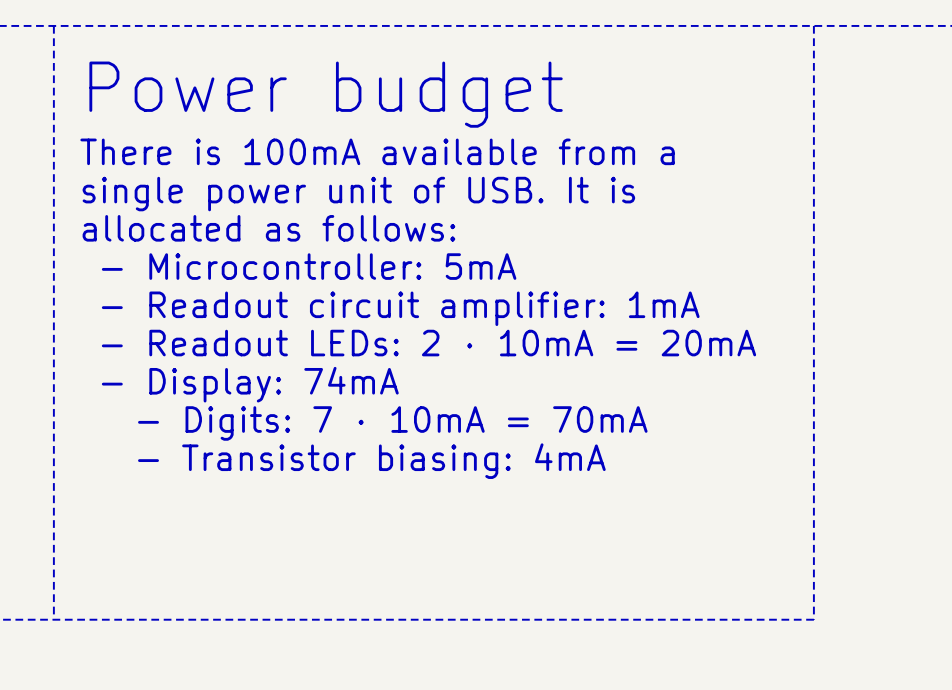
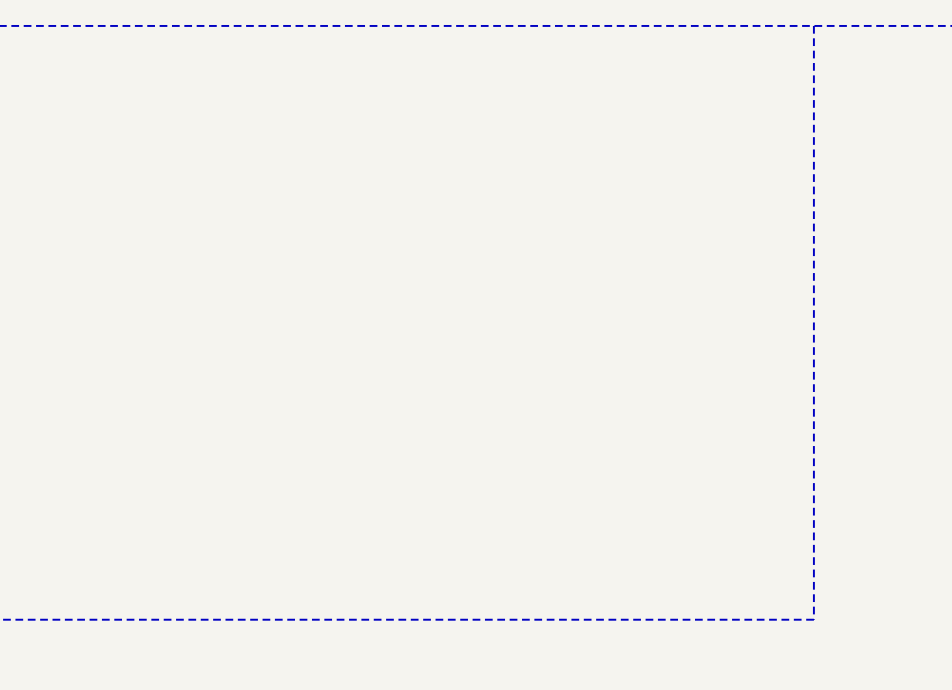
line: (53, 25) (53, 619) -> none
text: Power budget (326, 94) -> none
text: There is 100mA available from a (377, 151) -> none
text: single power unit of USB. It is (358, 194) -> none
text: allocated as follows: (268, 228) -> none
text: - Microcontroller: 5mA (309, 266) -> none
text: - Readout circuit amplifier: 1mA (400, 308) -> none
text: - Readout LEDs: 2 · 10mA = 20mA (428, 343) -> none
text: - Display: 74mA (250, 384) -> none
text: - Digits: 7 · 10mA = 70mA (392, 423) -> none
text: - Transistor biasing: 4mA (371, 461) -> none

